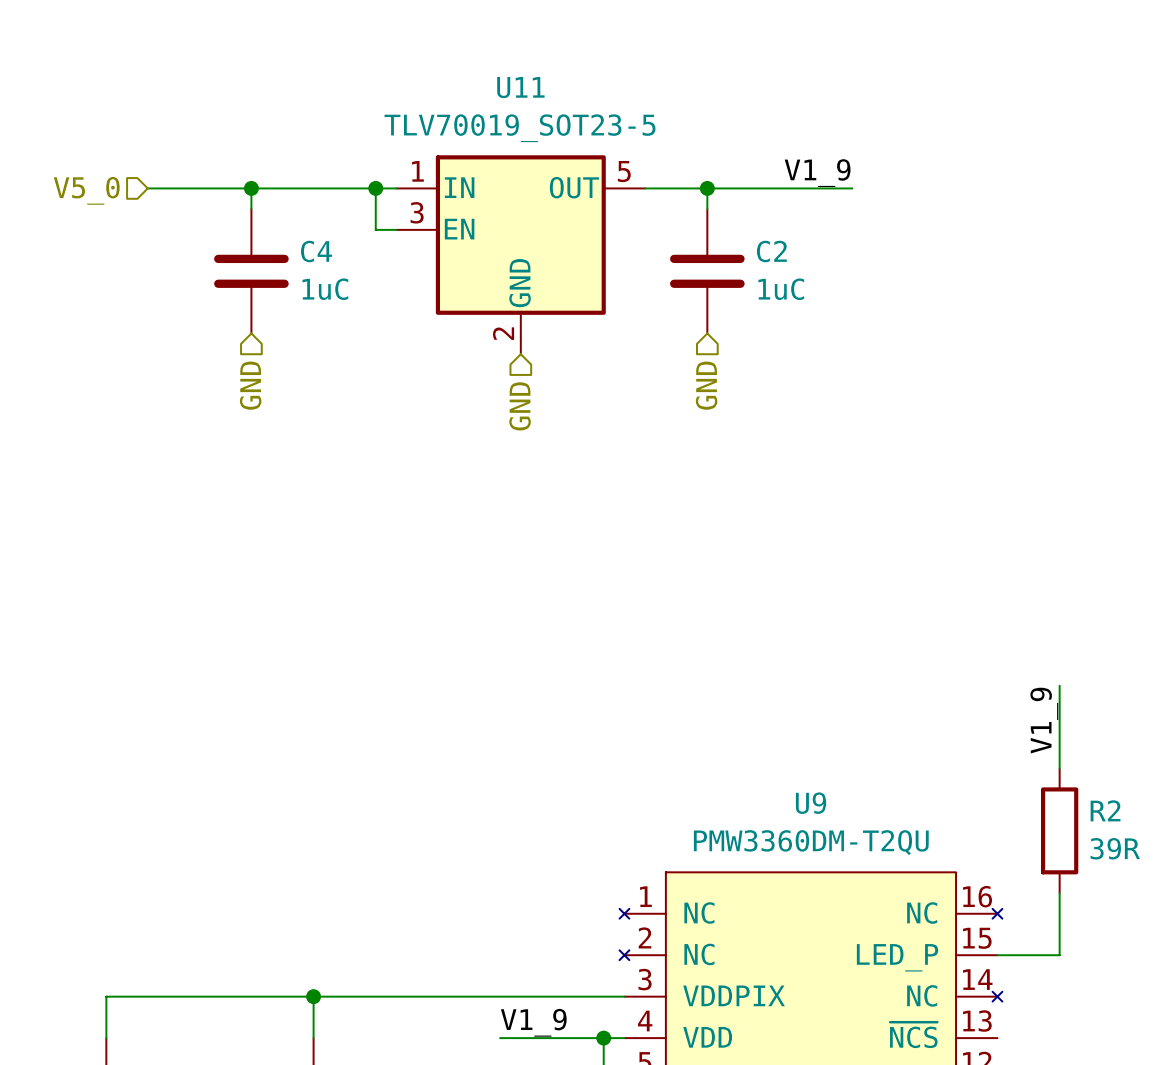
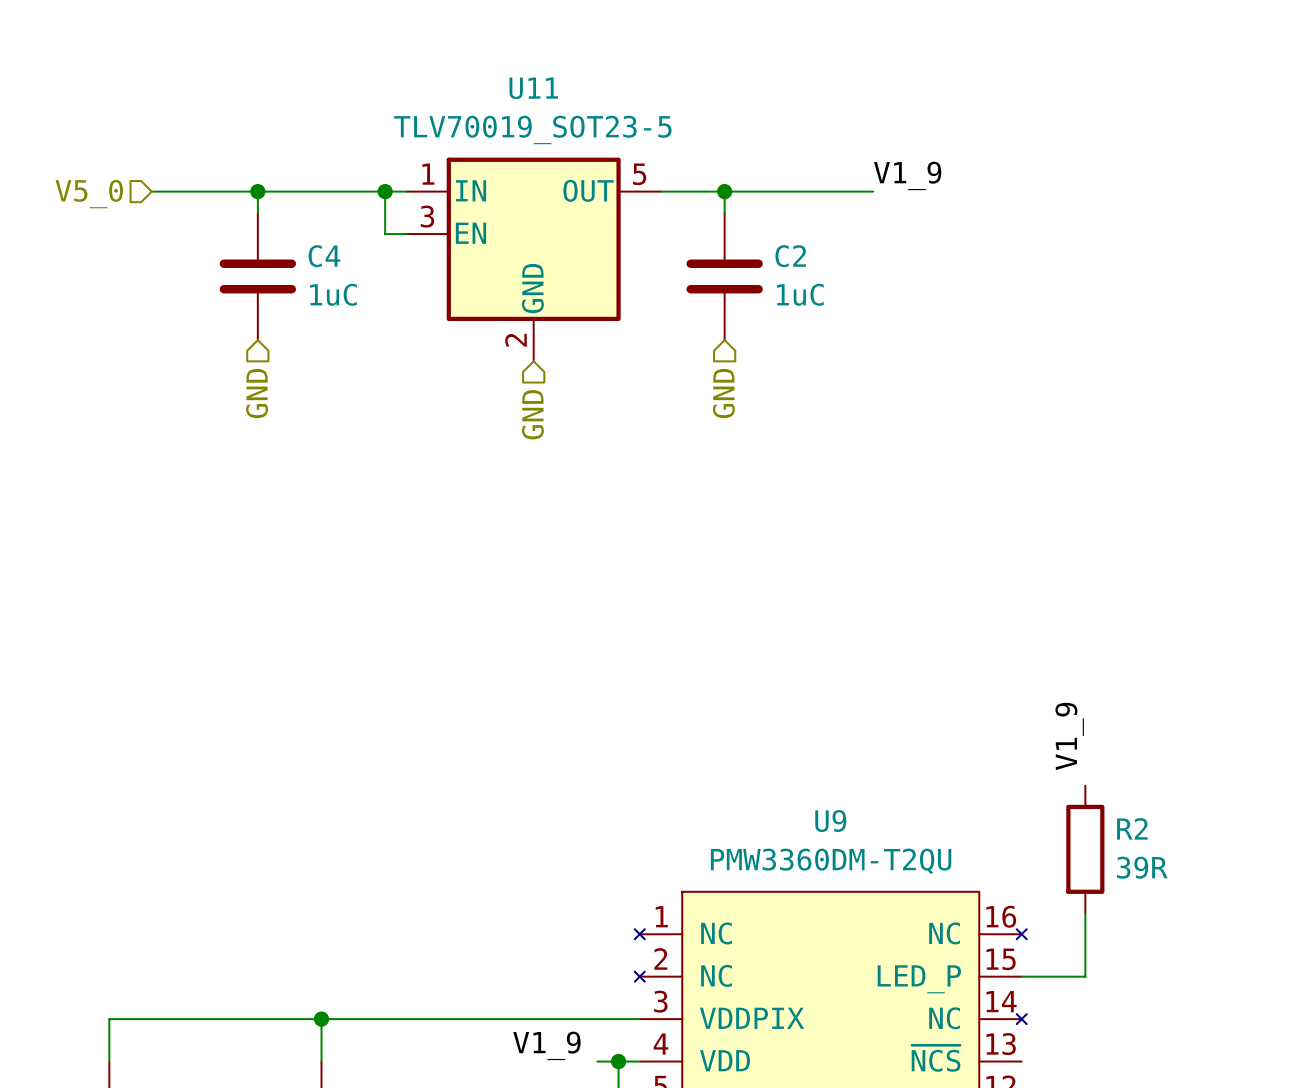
label position: V1_9 (817, 173) -> V1_9 (907, 175)
wire: (1059, 685) (1059, 768) -> none
wire: (500, 1038) (583, 1038) -> none

